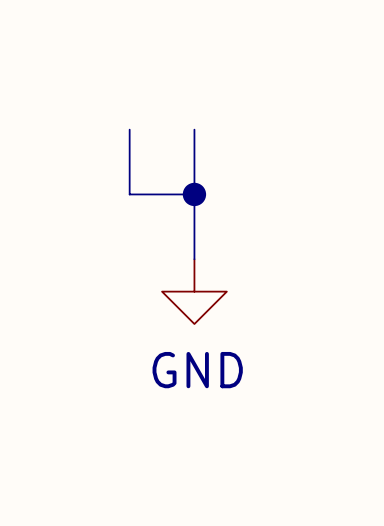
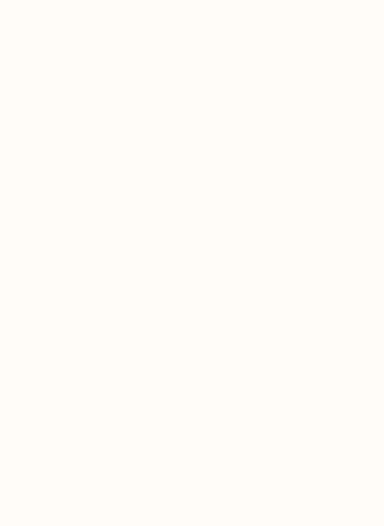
wire: (129, 129) (129, 194) (194, 194) -> none
wire: (194, 129) (194, 259) -> none
junction: (194, 194) -> none
power symbol: GND (194, 291) -> none

